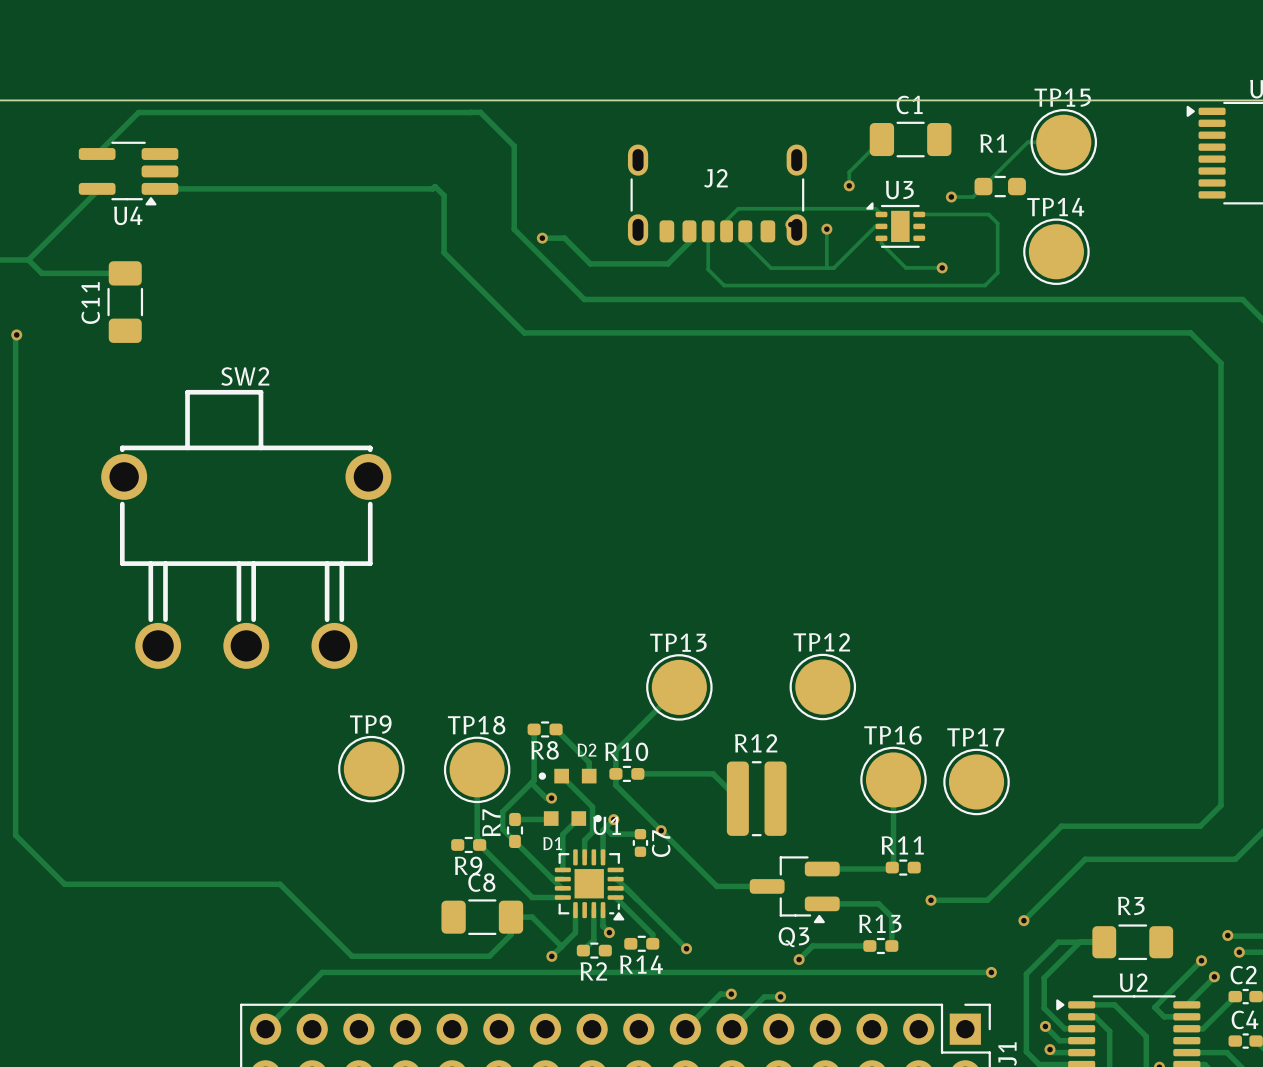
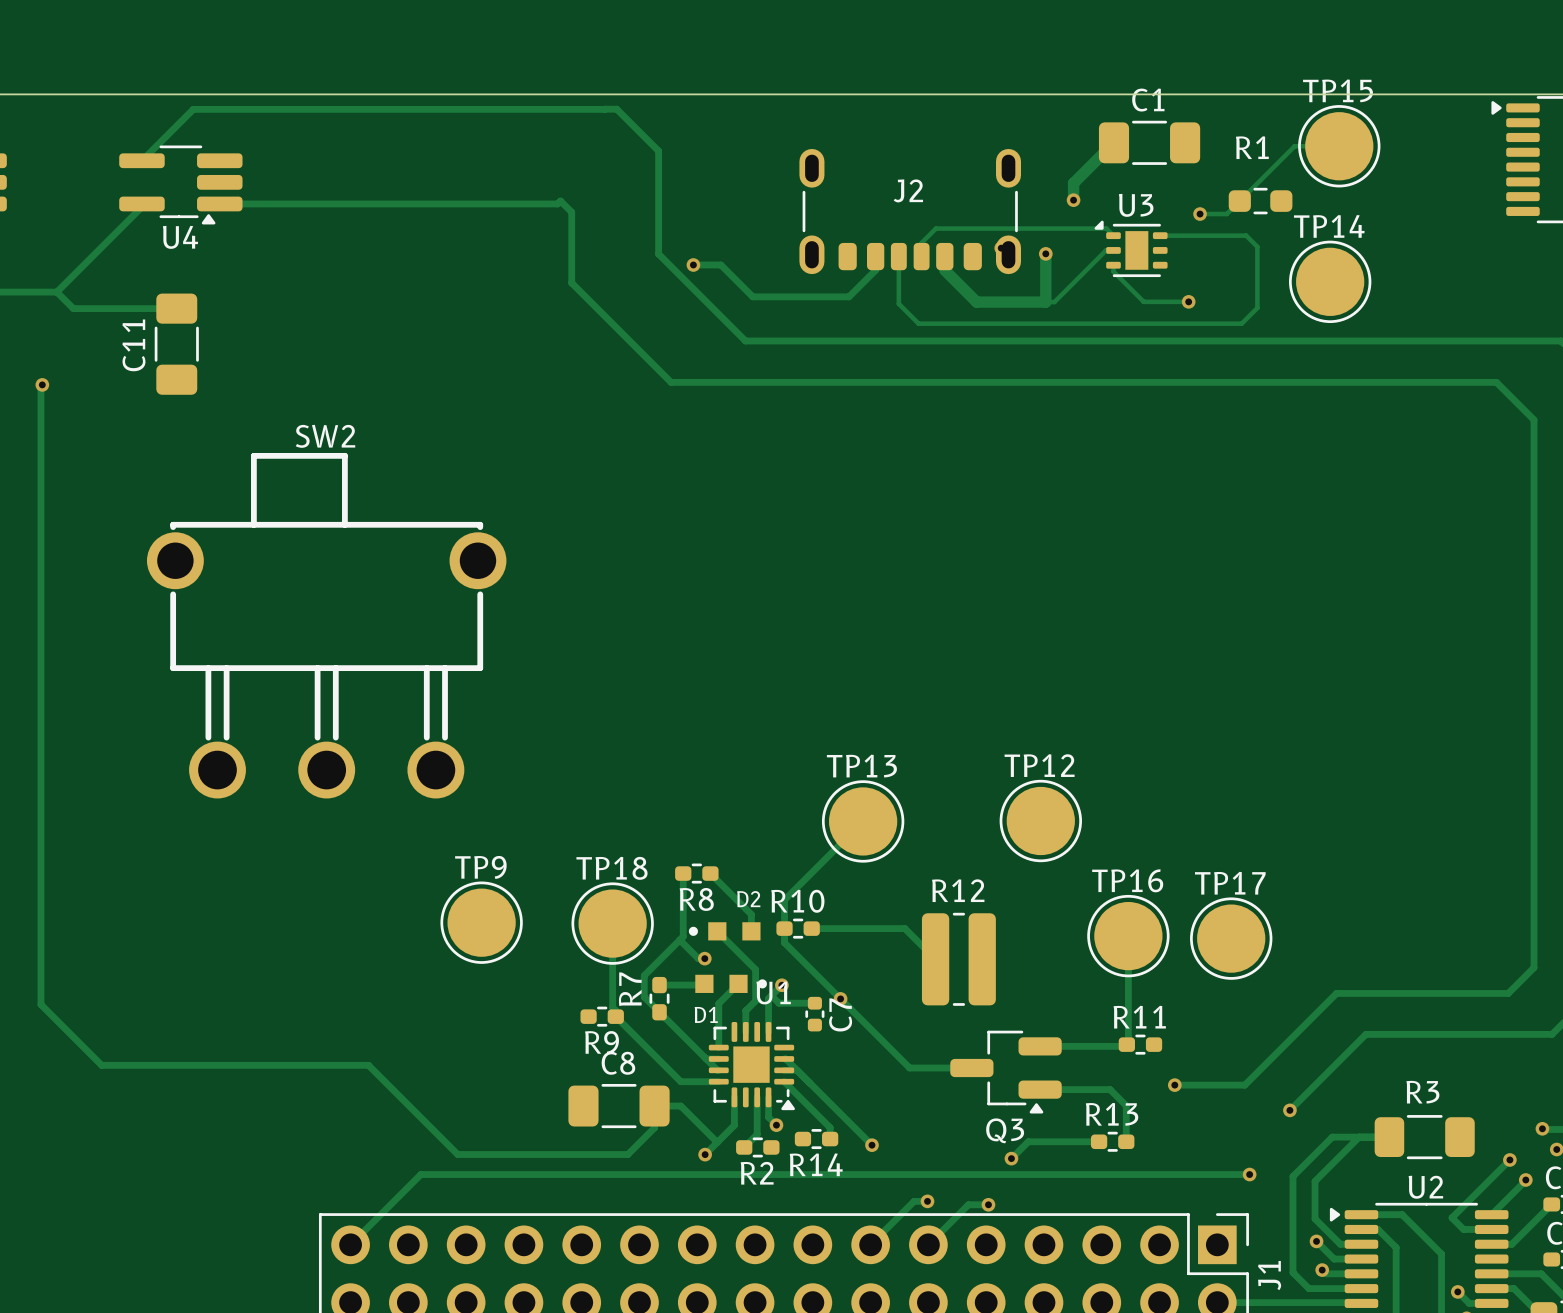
track width: thin (881, 139) (849, 172) (849, 185) -> thick (1114, 142) (1073, 183) (1073, 200)
track width: thin (826, 229) (826, 268) (771, 268) (745, 242) -> thick (1045, 253) (1045, 302) (976, 302) (944, 270)

